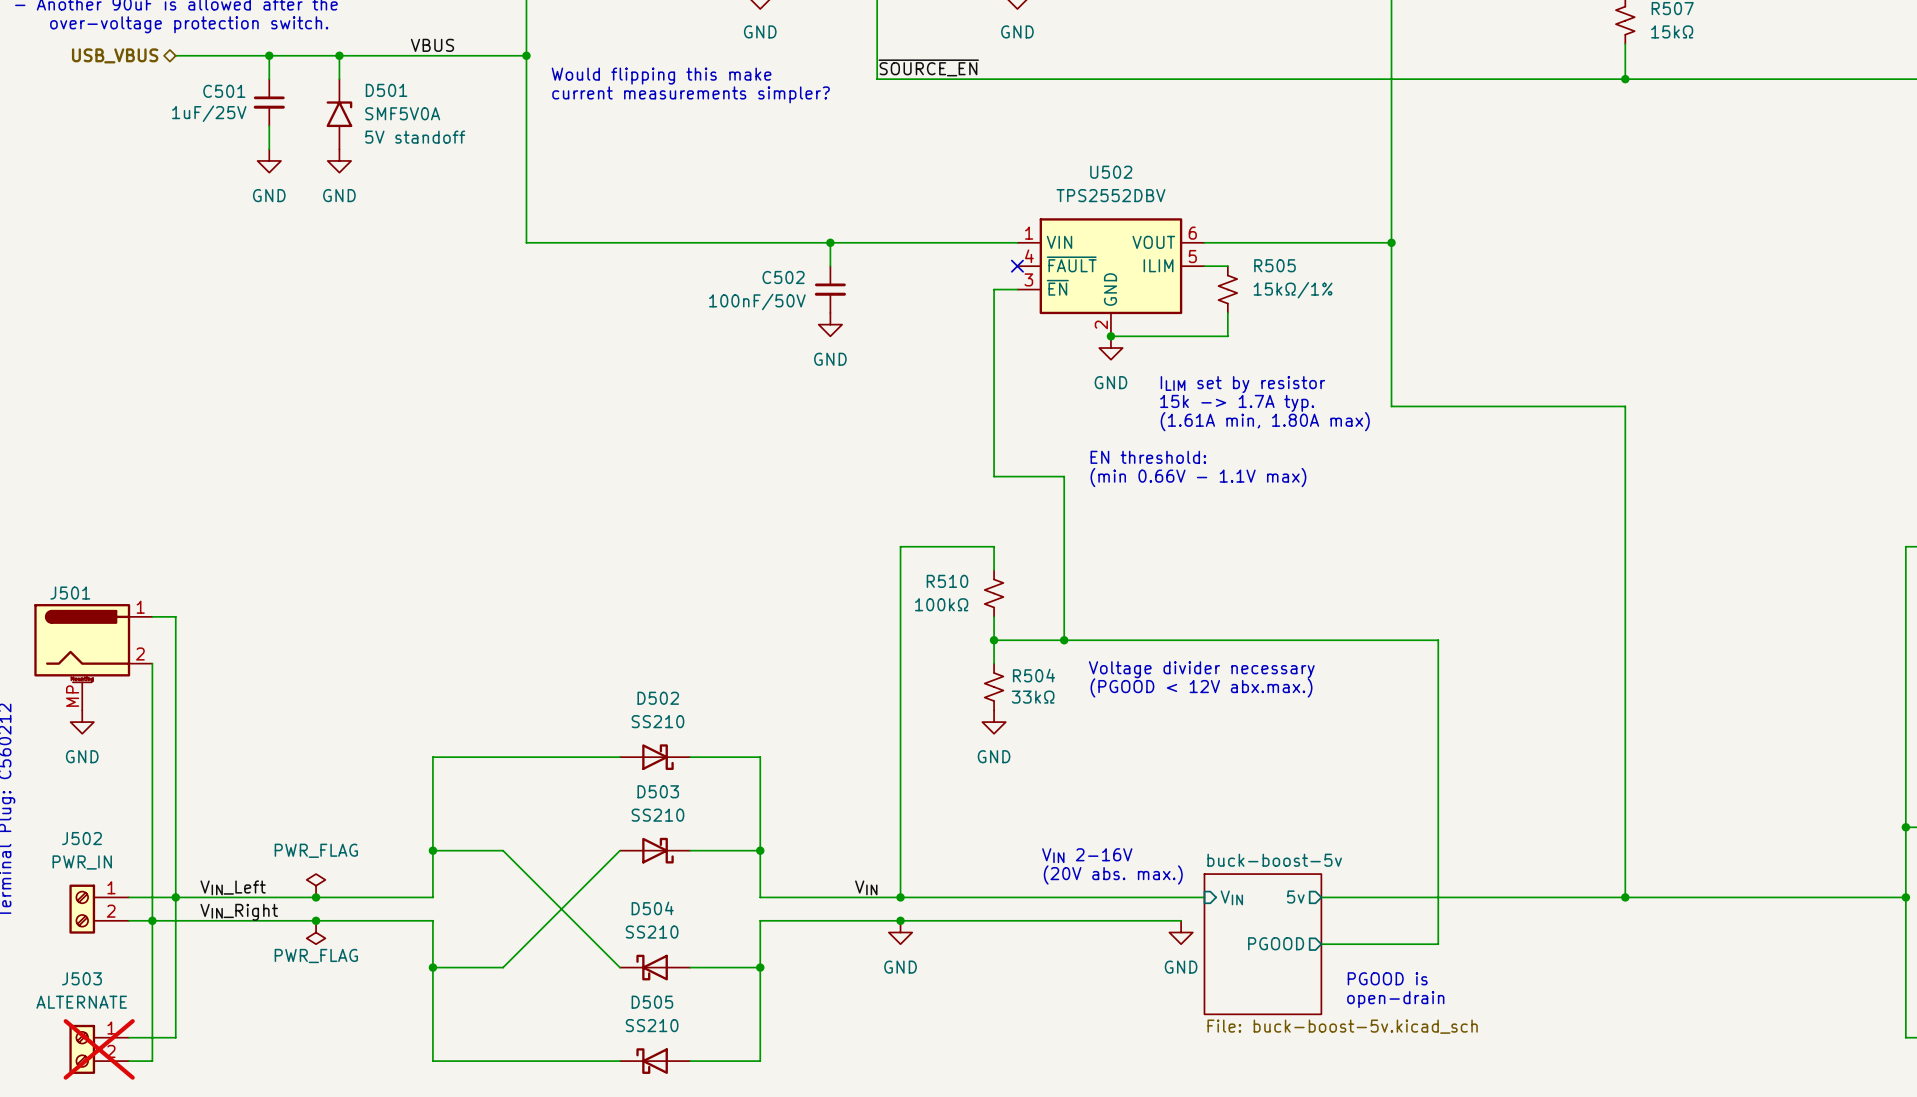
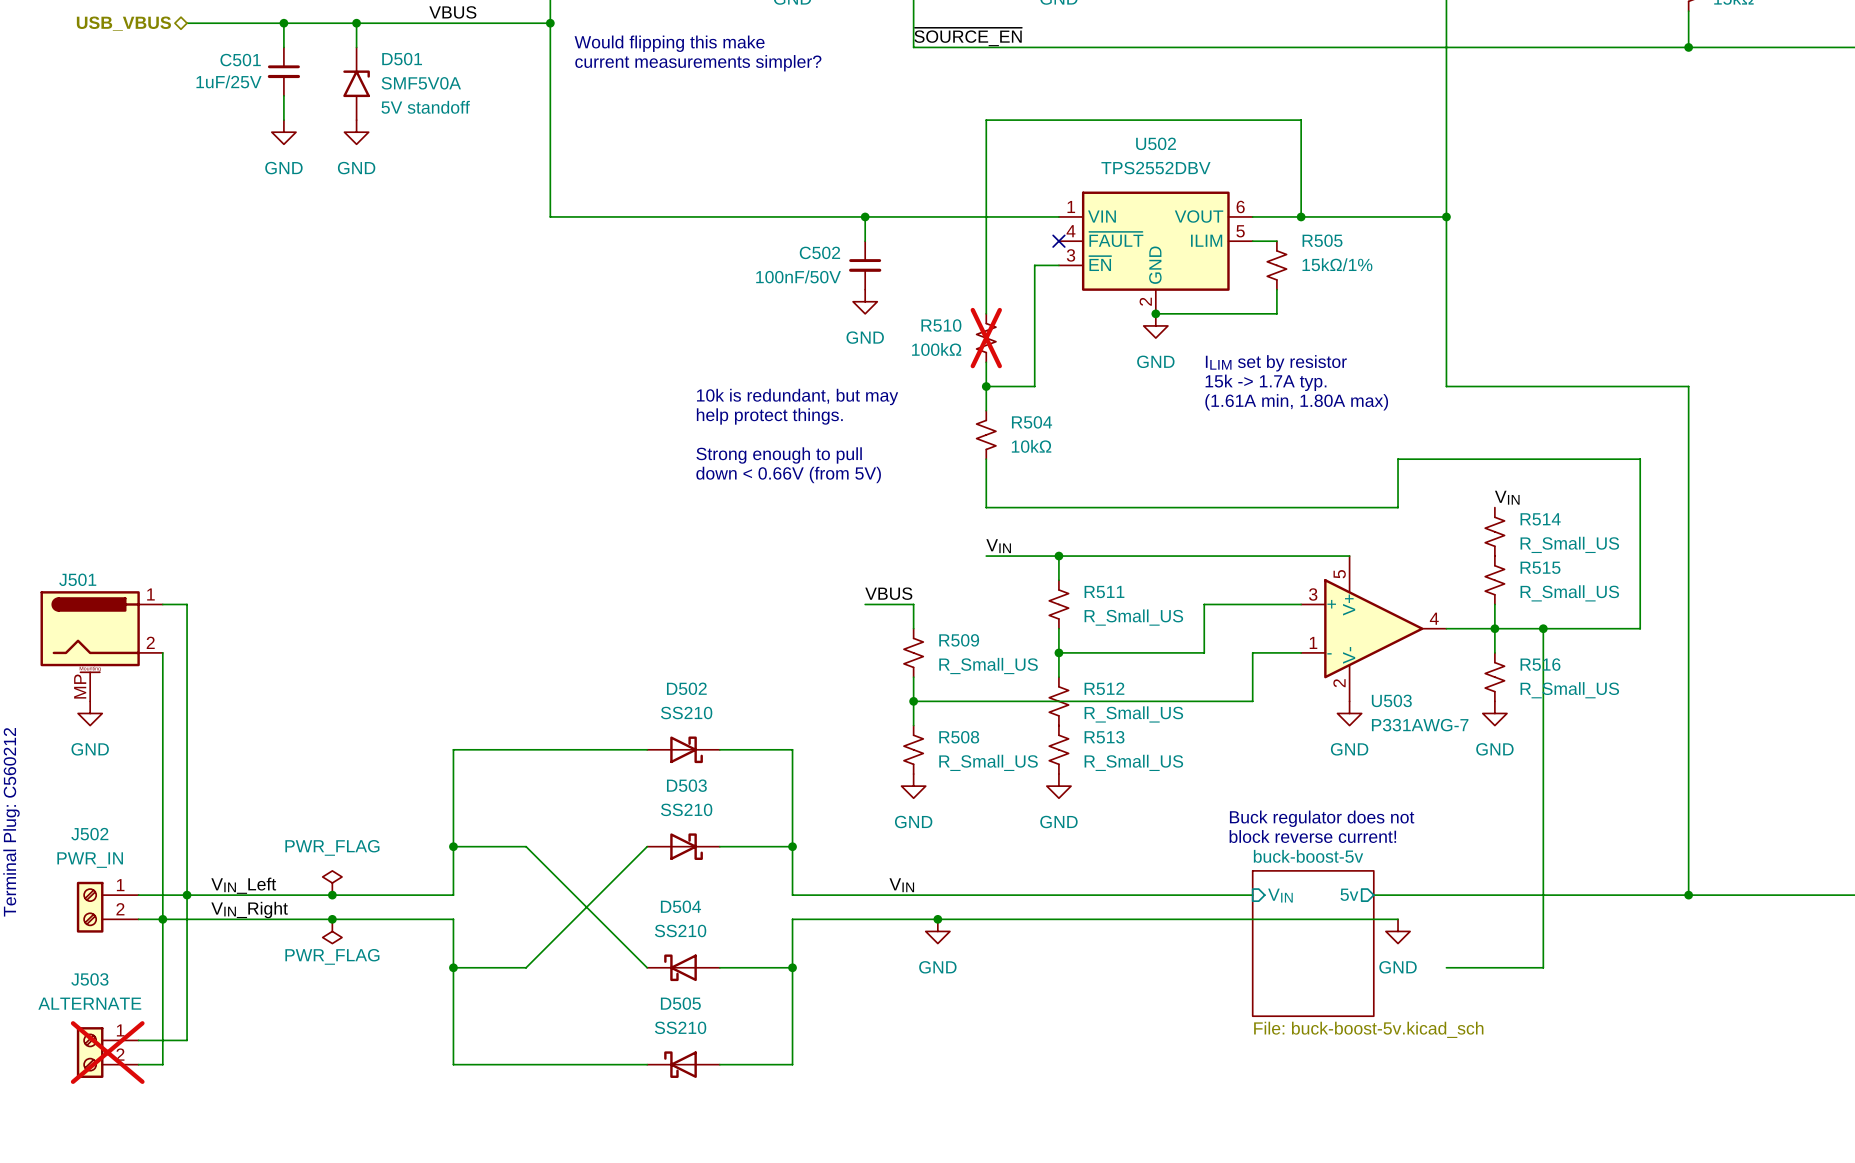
wire: none -> (1301, 216) (1301, 120) (986, 120) (986, 313)
junction: none -> (1301, 216)
R510 do-not-place cross: none -> (986, 338)
wire: none -> (986, 362) (986, 410)
junction: none -> (986, 386)
wire: (994, 406) (994, 476) (1064, 476) (1064, 640) -> (1034, 386) (986, 386)
text: none -> 10k is redundant, but may (797, 396)
text: none -> help protect things. (769, 416)
text: EN threshold: (1148, 457) -> none
text: none -> Strong enough to pull (779, 455)
wire: none -> (986, 459) (986, 507) (1398, 507) (1398, 459) (1640, 459) (1640, 628) (1494, 628) (1494, 604)
text: (min 0.66V - 1.1V max) (1198, 477) -> none
text: none -> down < 0.66V (from 5V) (788, 474)
label: none -> VIN (1507, 497)
R514: none -> R_Small_US (1494, 531)
label: none -> VIN (998, 546)
wire: none -> (986, 556) (1349, 556)
wire: (994, 570) (994, 546) (900, 546) (900, 897) -> none
wire: none -> (1058, 556) (1058, 580)
junction: none -> (1058, 556)
R510 position: (994, 593) -> (986, 338)
R515: none -> R_Small_US (1494, 580)
label: none -> VBUS (888, 593)
wire: none -> (865, 604) (913, 604) (913, 628)
wire: (994, 616) (994, 663) -> (1058, 628) (1058, 677)
R511: none -> R_Small_US (1058, 604)
wire: none -> (1301, 604) (1204, 604) (1204, 652) (1058, 652)
wire: (994, 640) (1391, 640) -> none
junction: (994, 640) -> none
junction: (1064, 640) -> none
U503: none -> P331AWG-7 (1373, 628)
junction: none -> (1494, 628)
wire: none -> (1543, 628) (1543, 967) (1446, 967)
junction: none -> (1543, 628)
R509: none -> R_Small_US (913, 652)
junction: none -> (1058, 652)
wire: none -> (1301, 652) (1252, 652) (1252, 701) (913, 701)
wire: (1438, 663) (1438, 944) (1321, 944) -> none
text: Voltage divider necessary (1201, 669) -> none
wire: none -> (913, 677) (913, 725)
R504 flip: as is (994, 687) -> left-right (986, 434)
R504 position: (994, 687) -> (986, 434)
text: (PGOOD < 12V abx.max.) (1201, 687) -> none
R516: none -> R_Small_US (1494, 677)
R504 value: 33kΩ (1033, 697) -> 10kΩ (1031, 446)
junction: none -> (913, 701)
R512: none -> R_Small_US (1058, 701)
power symbol: GND (994, 722) -> none
power symbol: none -> GND (1349, 713)
power symbol: none -> GND (1494, 713)
R508: none -> R_Small_US (913, 749)
R513: none -> R_Small_US (1058, 749)
power symbol: none -> GND (913, 786)
power symbol: none -> GND (1058, 786)
text: none -> Buck regulator does not (1322, 818)
text: none -> block reverse current! (1312, 836)
text: VIN 2-16V (1087, 855) -> none
text: (20V abs. max.) (1113, 874) -> none
junction: (900, 897) -> none
wire: none -> (1228, 919) (1398, 919)
power symbol: GND (1181, 932) -> none
power symbol: none -> GND (1398, 931)
sheet pin: PGOOD (1276, 943) -> none
text: PGOOD is (1387, 978) -> none
text: open-drain (1395, 999) -> none

